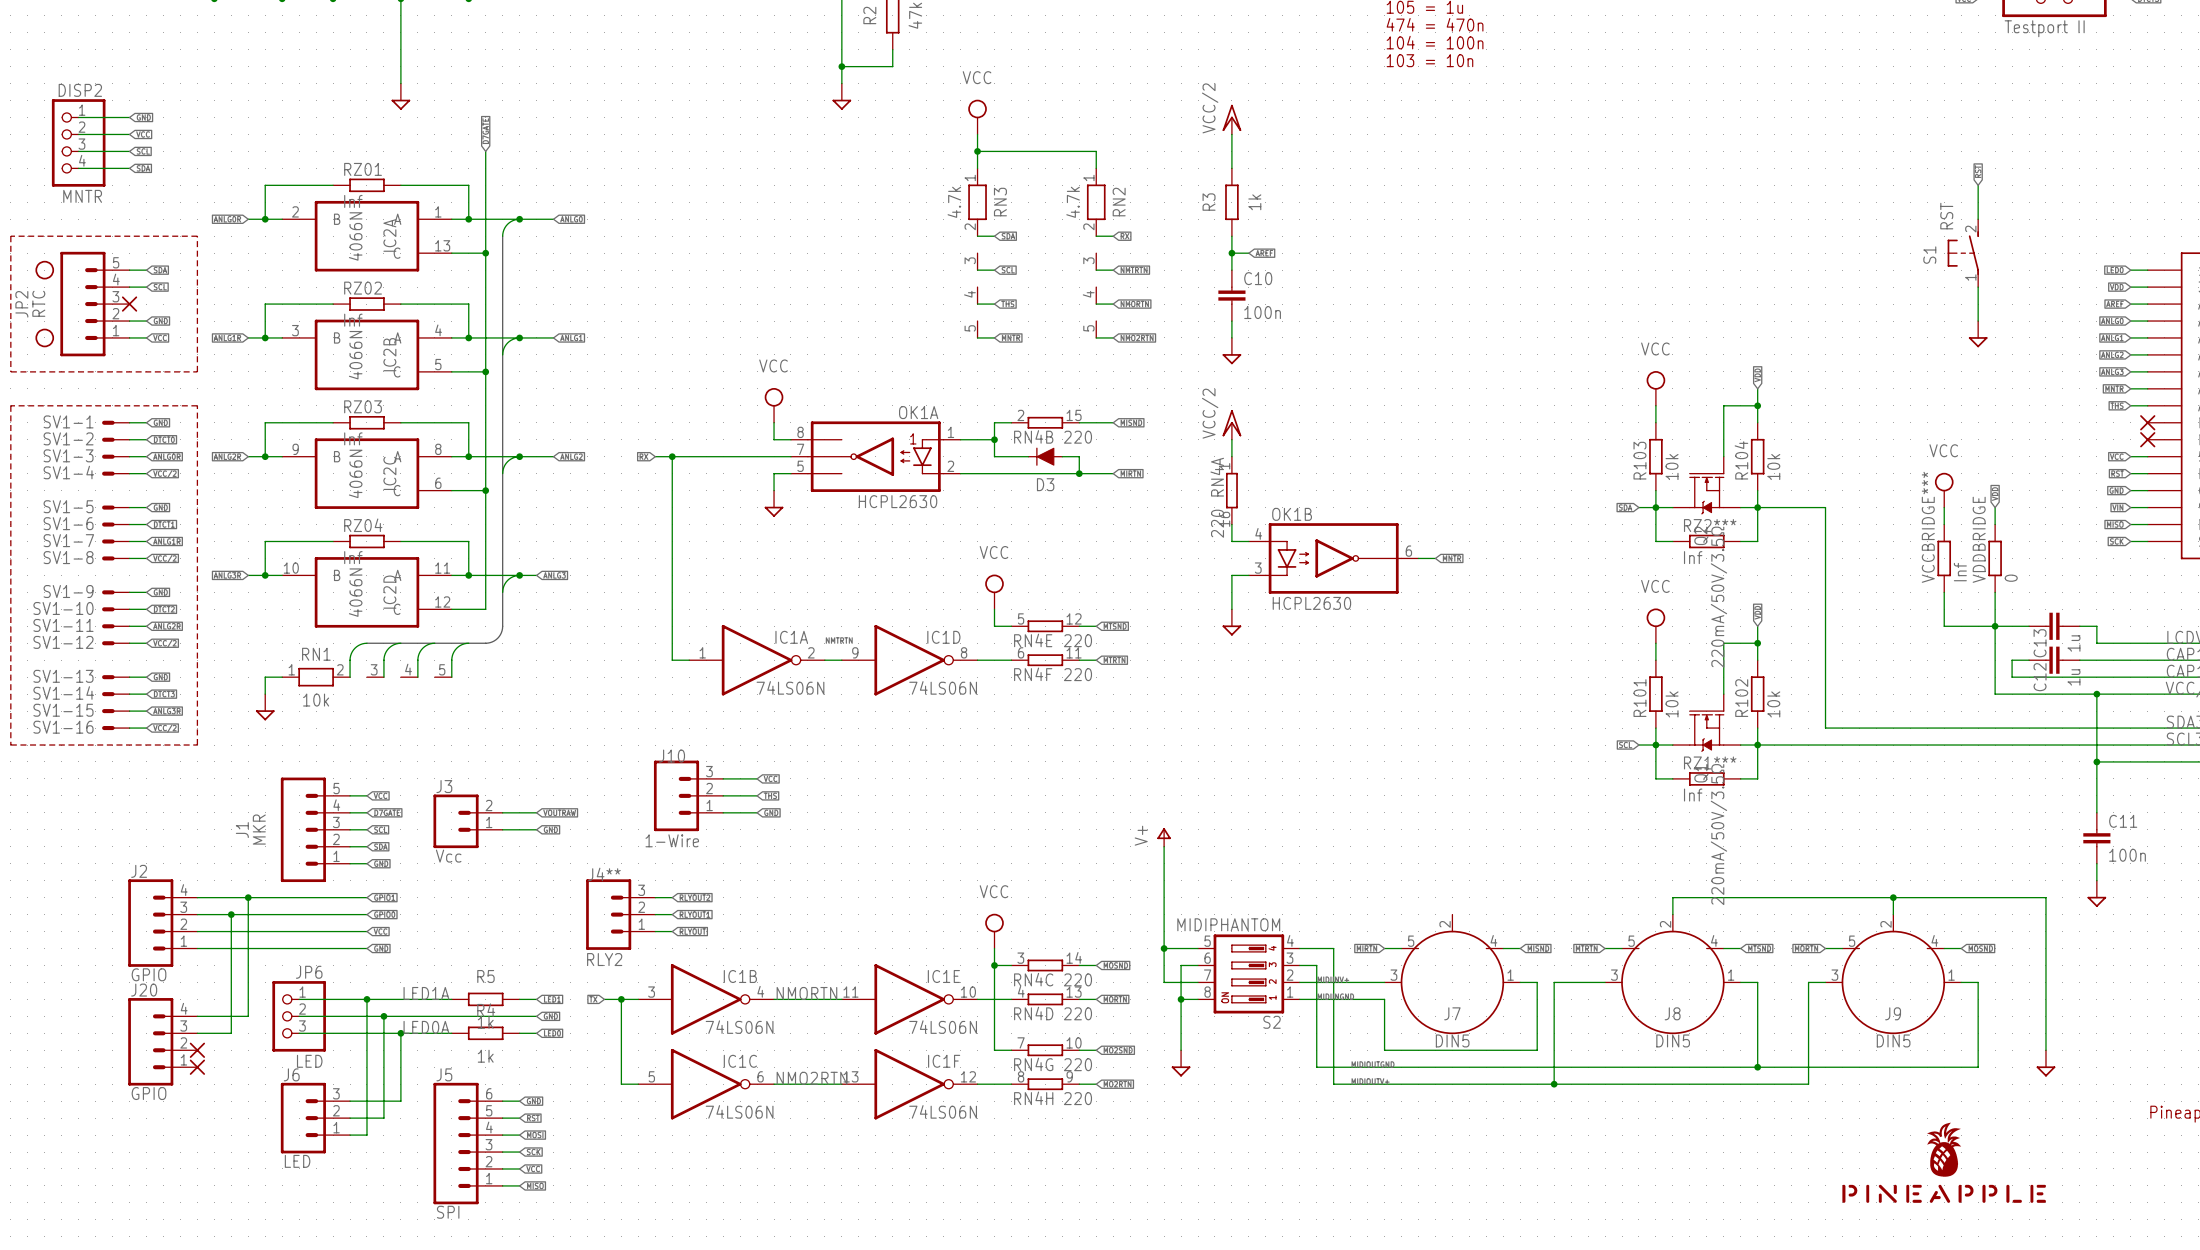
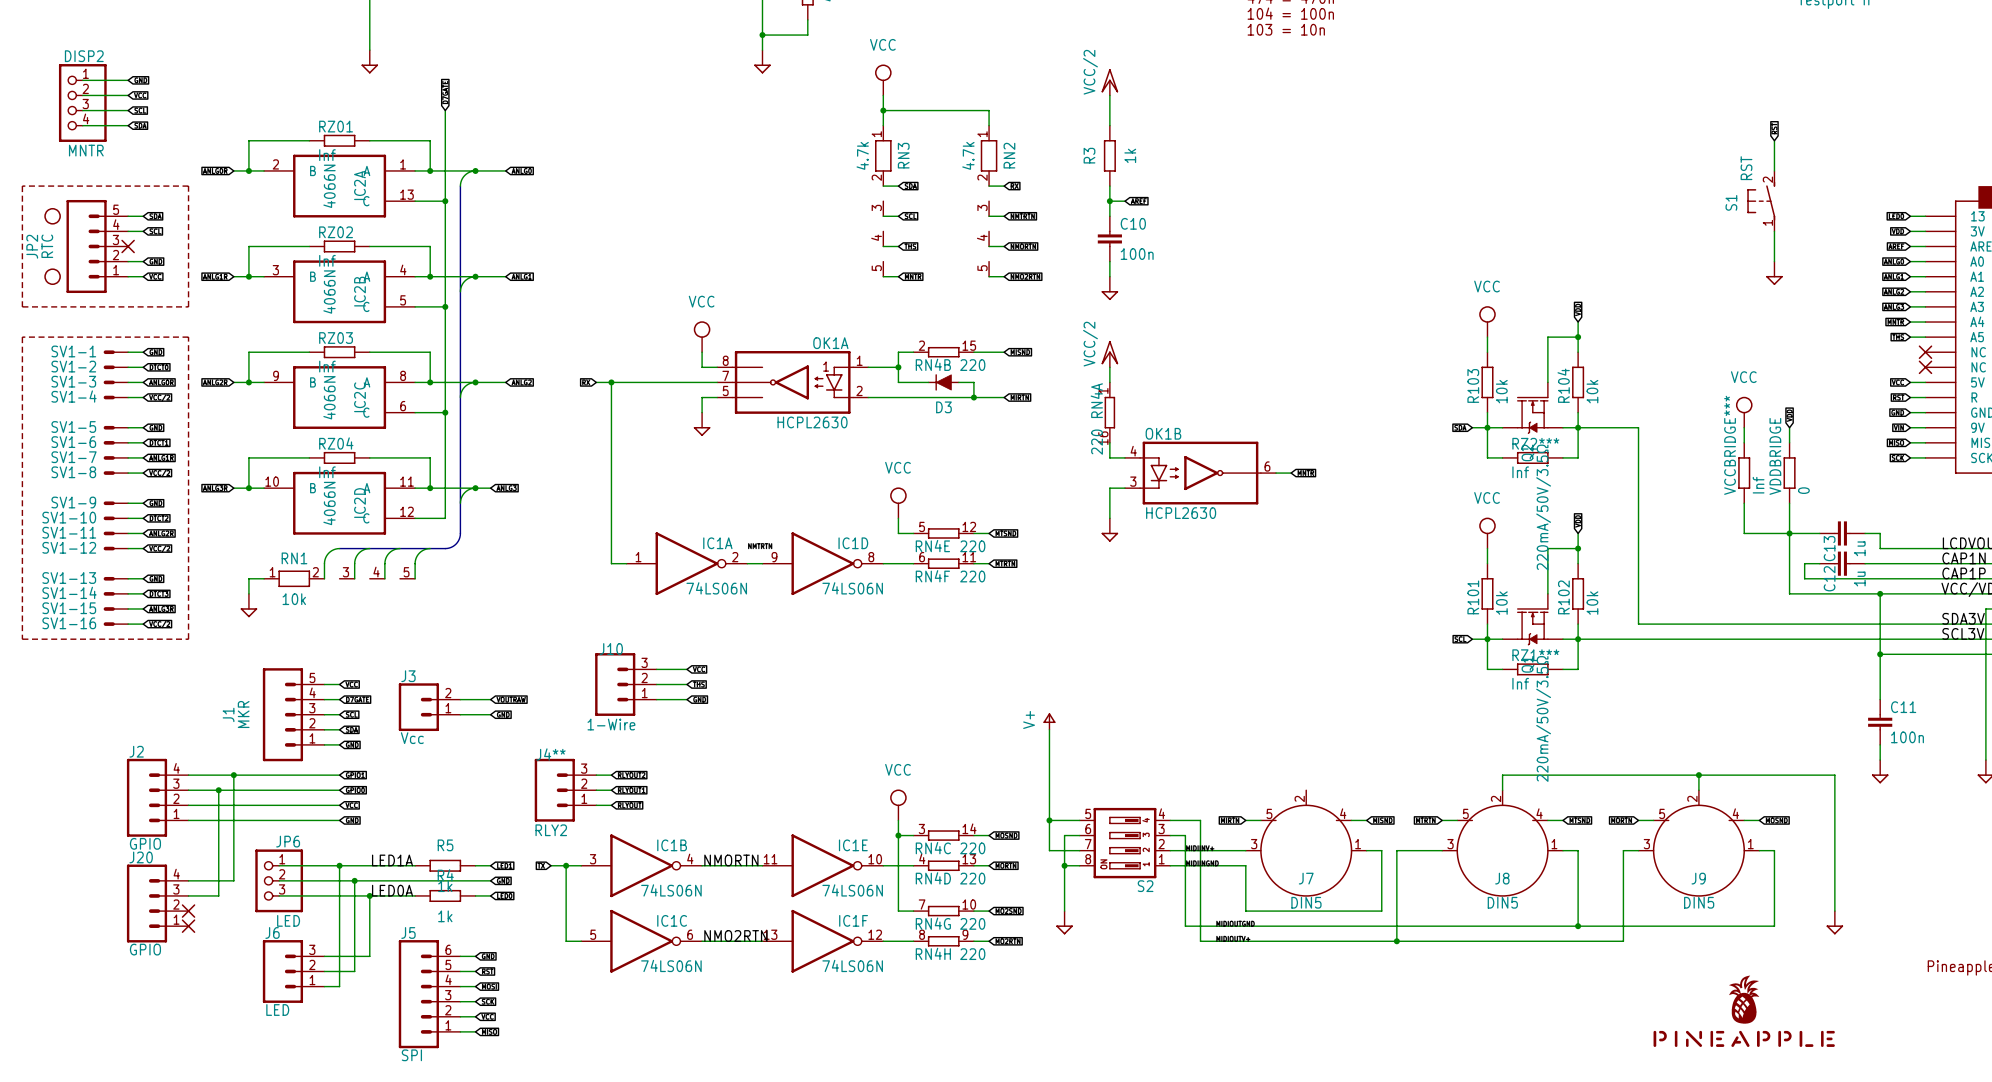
S2 value: MIDIPHANTOM (1228, 924) -> none

